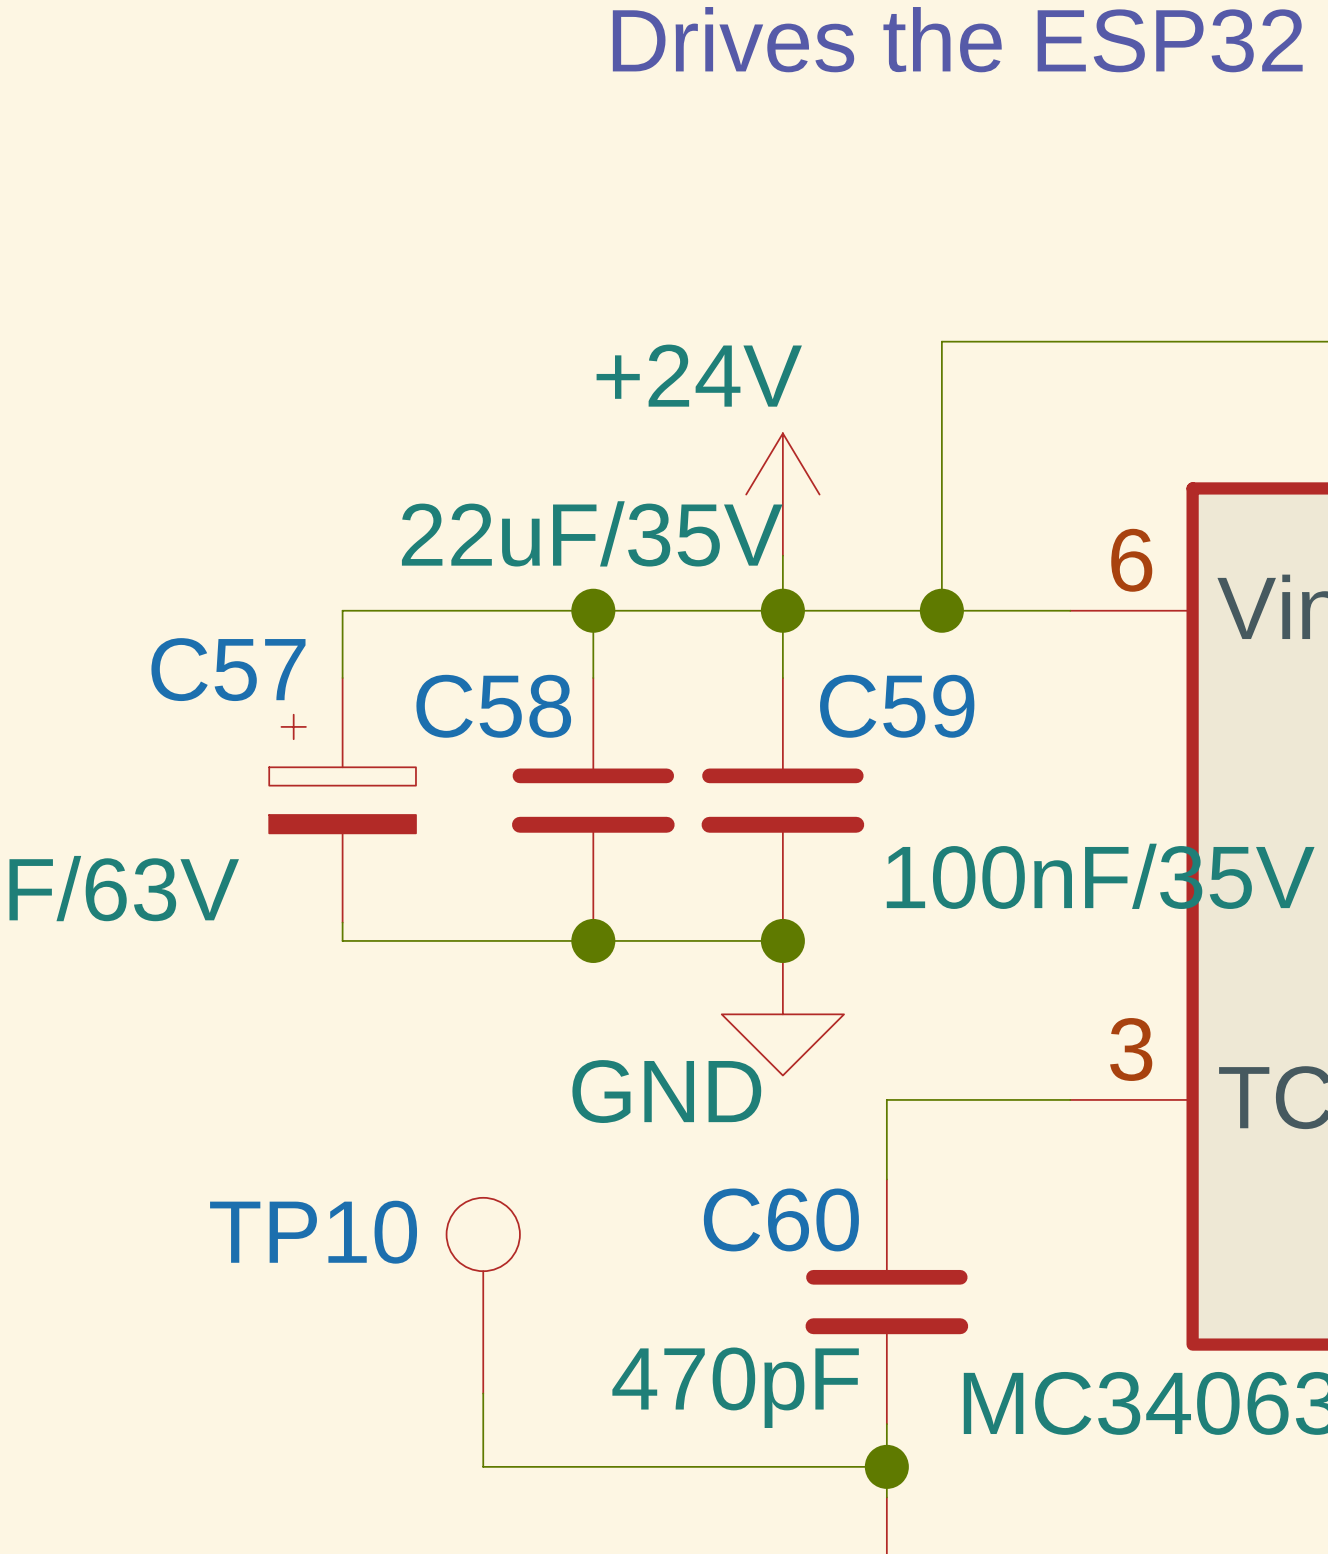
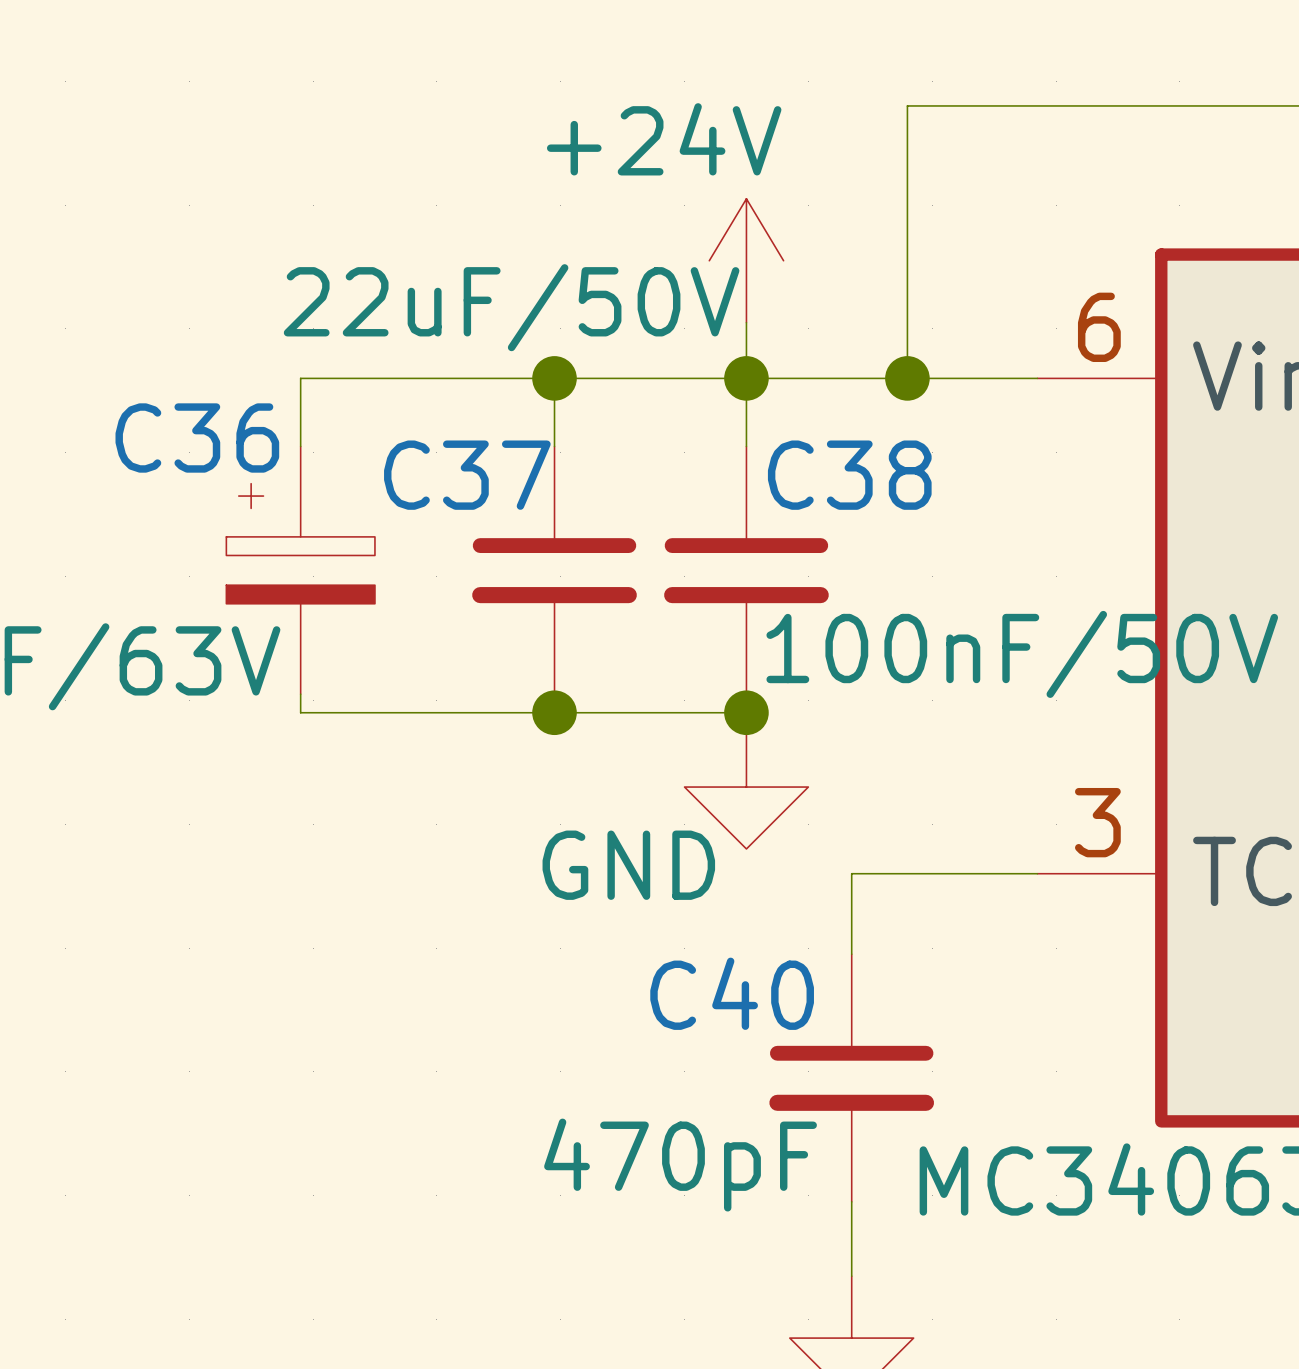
C58 value: 22uF/35V (592, 533) -> 22uF/50V (511, 307)
C57 name: C57 (228, 669) -> C36 (197, 438)
C58 name: C58 (493, 706) -> C37 (467, 475)
C59 name: C59 (897, 706) -> C38 (849, 475)
C59 value: 100nF/35V (1100, 876) -> 100nF/50V (1022, 654)
C60 name: C60 (781, 1219) -> C40 (732, 993)
TP10: (483, 1295) -> none
wire: (483, 1393) (483, 1466) (886, 1466) -> none
junction: (886, 1466) -> none

